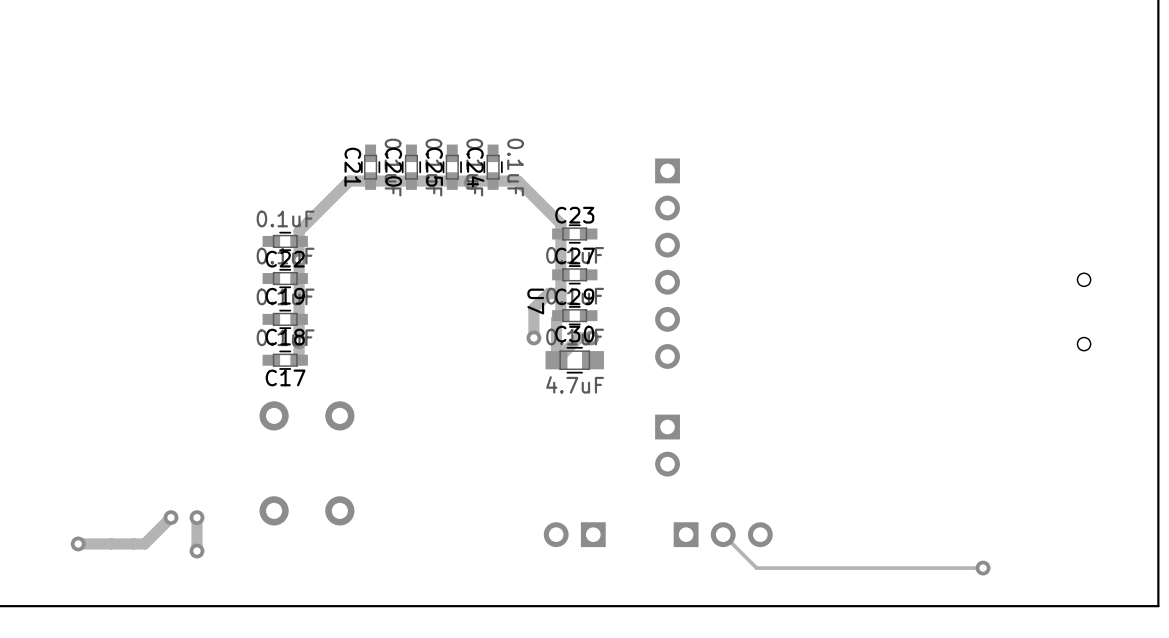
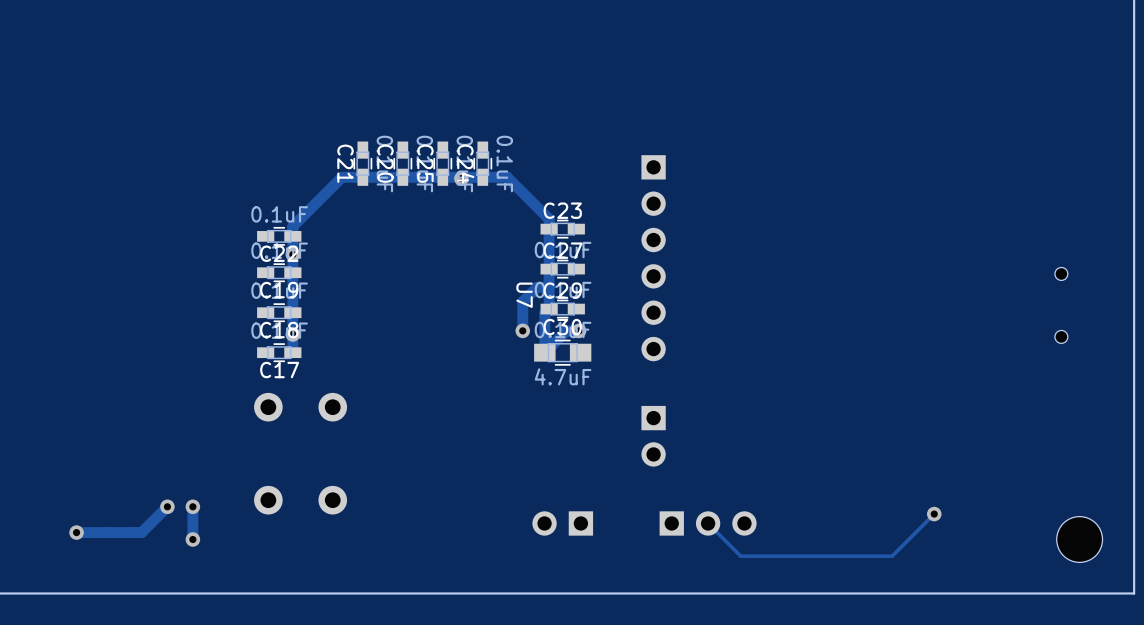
part: none -> (1079, 539)
track: (983, 568) (911, 568) -> (934, 514) (892, 556)
via position: (983, 568) -> (934, 514)

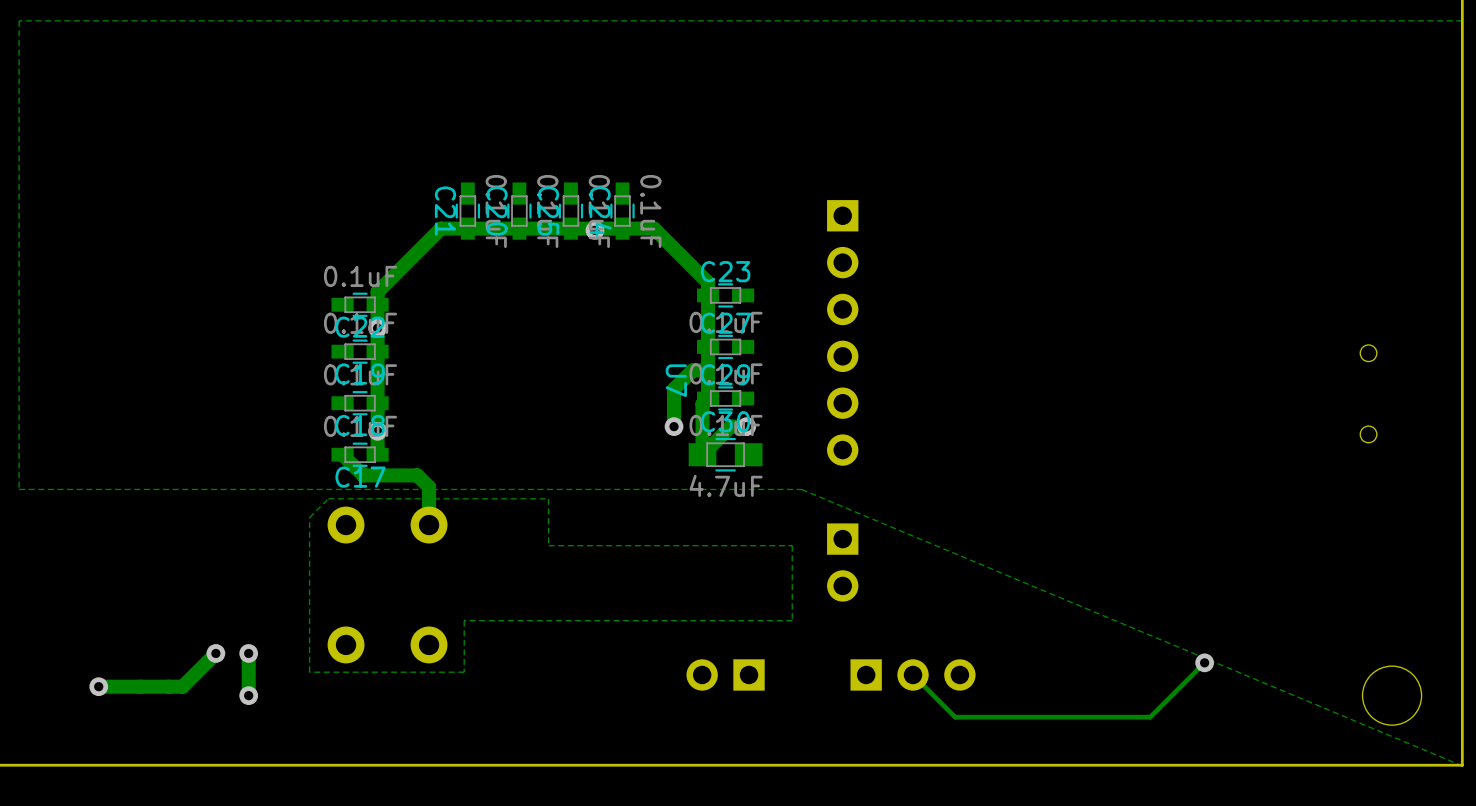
zone outline: none -> (1462, 20) (19, 20) (19, 489) (801, 489) (1462, 765) (1462, 20)
track: none -> (342, 454) (363, 475) (417, 475) (429, 487) (429, 525)
zone outline: none -> (548, 498) (328, 498) (309, 517) (309, 672) (464, 672) (464, 620) (792, 620) (792, 545) (548, 545) (548, 498)

